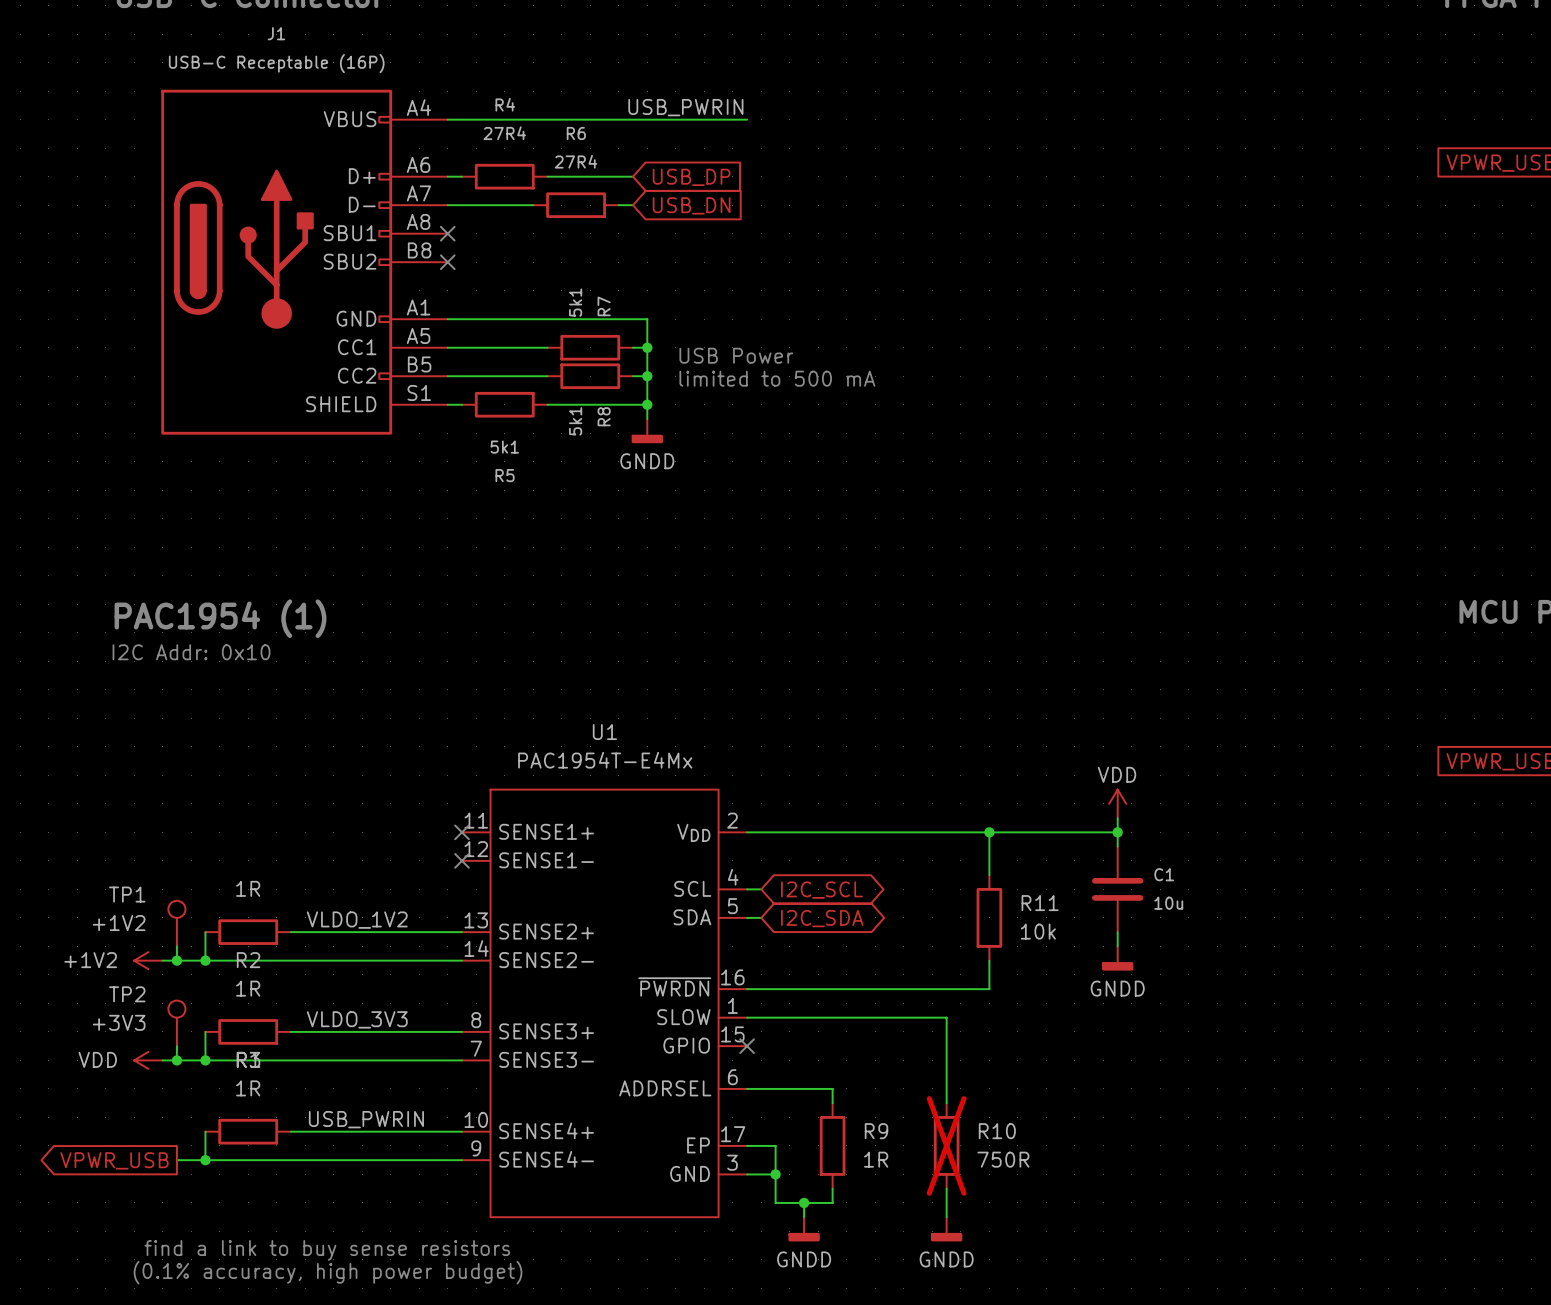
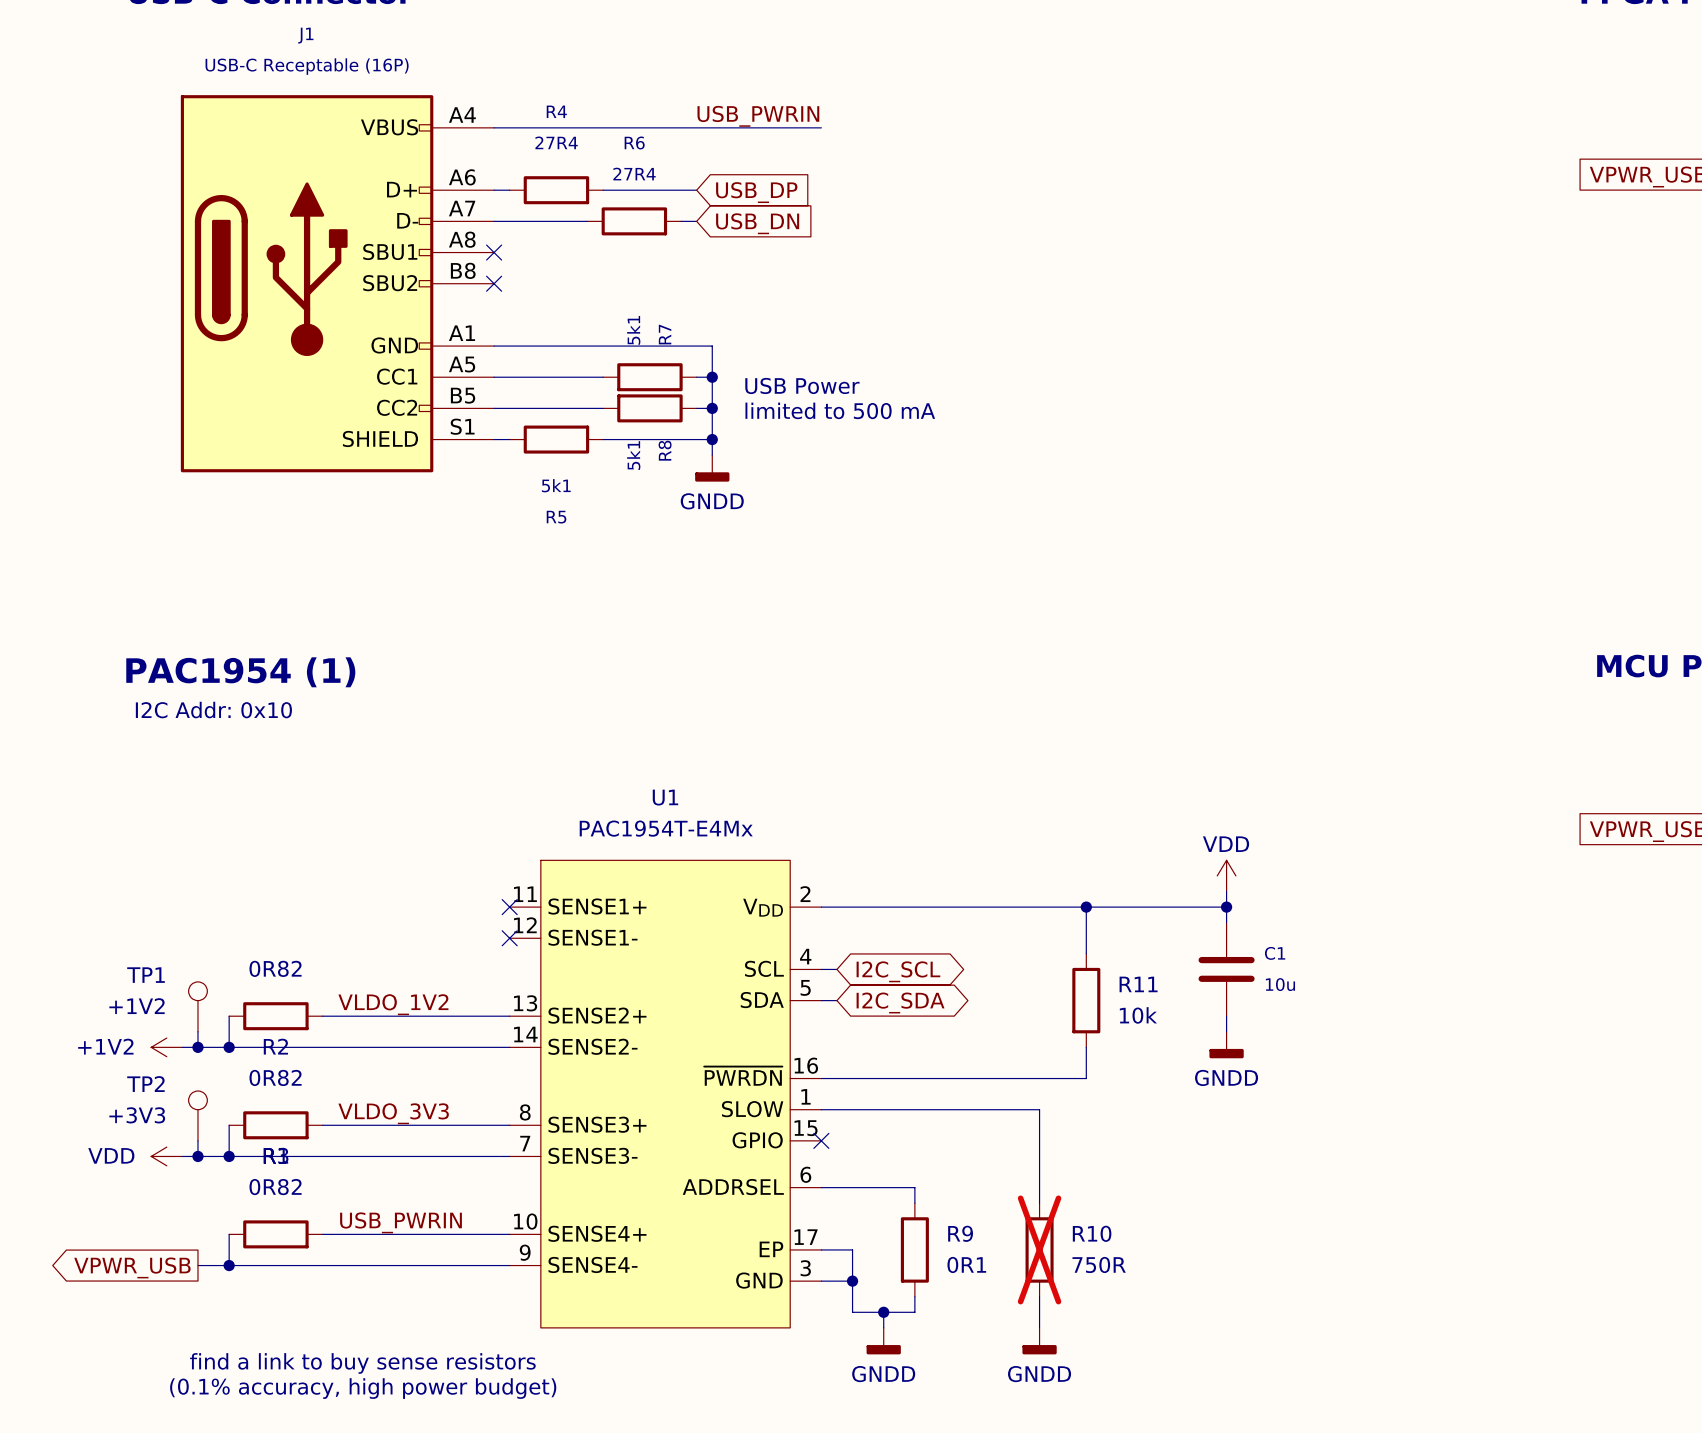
part value: 1R (248, 888) -> 0R82 (275, 968)
R2 value: 1R (248, 988) -> 0R82 (275, 1077)
part value: 1R (248, 1088) -> 0R82 (275, 1187)
R9 value: 1R (876, 1159) -> 0R1 (966, 1264)

